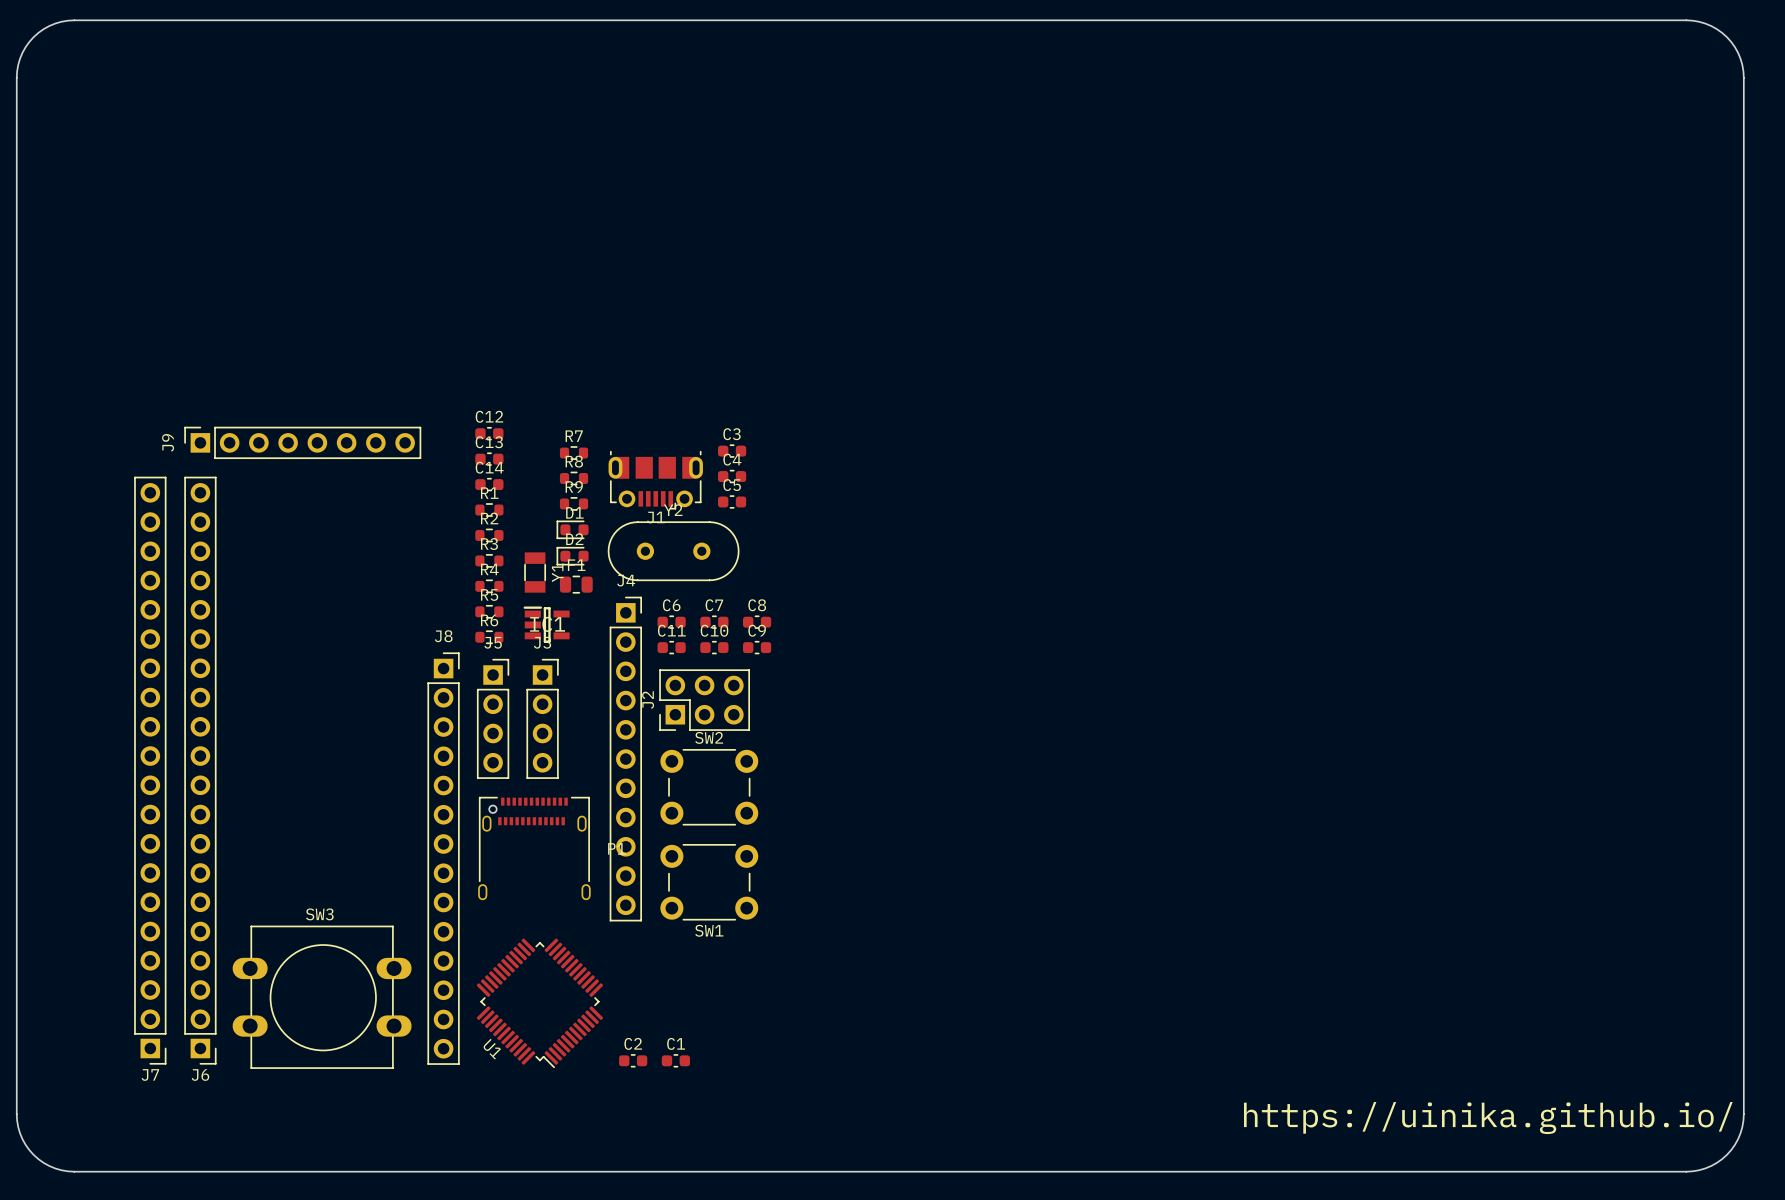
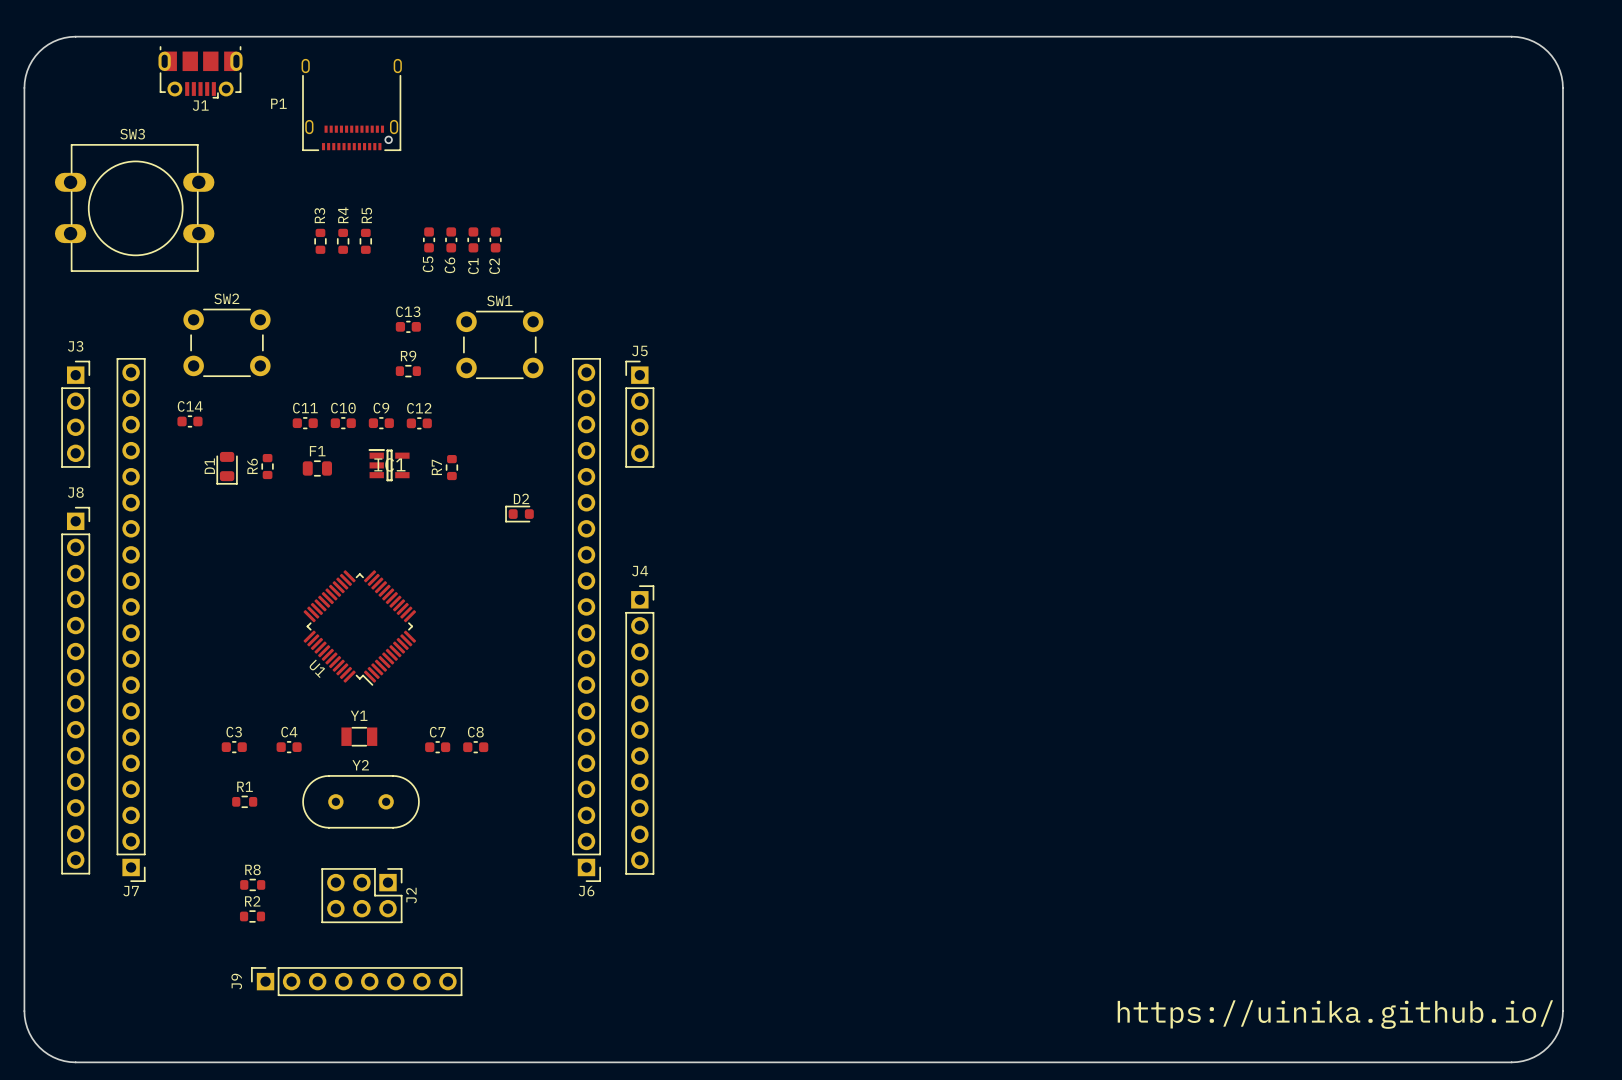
C12 position: (489, 433) -> (419, 423)
R7 name position: R7 (574, 436) -> R7 (436, 467)
J9 position: (302, 442) -> (356, 981)
C3 position: (732, 451) -> (234, 747)
R7 rotation: 0° (574, 453) -> 90° clockwise (451, 467)
R7 position: (574, 453) -> (451, 467)
C13 position: (489, 459) -> (408, 326)
C4 position: (732, 476) -> (289, 747)
R8 position: (574, 478) -> (252, 884)
J1 position: (655, 480) -> (200, 72)
C14 position: (489, 484) -> (189, 421)
C5 name position: C5 (732, 485) -> C5 (428, 264)
C5 rotation: 0° (732, 501) -> 90° clockwise (429, 239)
C5 position: (732, 501) -> (429, 239)
R9 position: (574, 503) -> (408, 371)
R1 position: (489, 510) -> (244, 801)
D1 name position: D1 (574, 512) -> D1 (209, 466)
D1 footprint: [556, 520, 589, 539] -> [216, 451, 238, 485]
R2 position: (489, 535) -> (252, 916)
Y2 position: (673, 551) -> (361, 801)
R3 rotation: 0° (489, 560) -> 90° clockwise (320, 241)
R3 position: (489, 560) -> (320, 241)
Y1 rotation: 0° (535, 572) -> 90° clockwise (359, 736)
Y1 position: (535, 572) -> (359, 736)
Y1 name position: Y1 (557, 572) -> Y1 (359, 715)
F1 position: (576, 584) -> (317, 468)
R4 rotation: 0° (489, 586) -> 90° clockwise (343, 241)
R4 position: (489, 586) -> (343, 241)
C6 name position: C6 (671, 605) -> C6 (449, 265)
R5 rotation: 0° (489, 611) -> 90° clockwise (365, 241)
R5 position: (489, 611) -> (365, 241)
R6 name position: R6 (489, 620) -> R6 (252, 466)
C6 rotation: 0° (671, 622) -> 90° clockwise (451, 239)
C6 position: (671, 622) -> (451, 239)
C7 position: (714, 622) -> (437, 747)
C8 position: (757, 622) -> (475, 747)
IC1 position: (546, 624) -> (389, 465)
R6 rotation: 0° (489, 637) -> 90° clockwise (267, 466)
R6 position: (489, 637) -> (267, 466)
C11 position: (671, 647) -> (305, 423)
C10 position: (714, 647) -> (343, 423)
C9 position: (757, 647) -> (381, 423)
J5 footprint: [477, 659, 510, 779] -> [625, 360, 655, 468]
J2 rotation: 0° (704, 700) -> 180° (361, 895)
J2 position: (704, 700) -> (361, 895)
J3 position: (542, 718) -> (75, 414)
J4 position: (625, 759) -> (639, 730)
J7 position: (150, 770) -> (131, 619)
J6 position: (200, 770) -> (586, 619)
SW2 position: (709, 787) -> (226, 342)
P1 rotation: 0° (534, 848) -> 180° (351, 104)
P1 position: (534, 848) -> (351, 104)
J8 position: (443, 858) -> (75, 690)
SW1 position: (709, 882) -> (499, 344)
SW1 name position: SW1 (709, 930) -> SW1 (499, 300)
SW3 position: (322, 997) -> (134, 207)
U1 position: (539, 1003) -> (359, 627)
C2 name position: C2 (633, 1043) -> C2 (494, 266)
C1 name position: C1 (676, 1043) -> C1 (473, 266)
C2 rotation: 0° (633, 1060) -> 90° clockwise (495, 239)
C2 position: (633, 1060) -> (495, 239)
C1 rotation: 0° (675, 1060) -> 90° clockwise (473, 239)
C1 position: (675, 1060) -> (473, 239)

